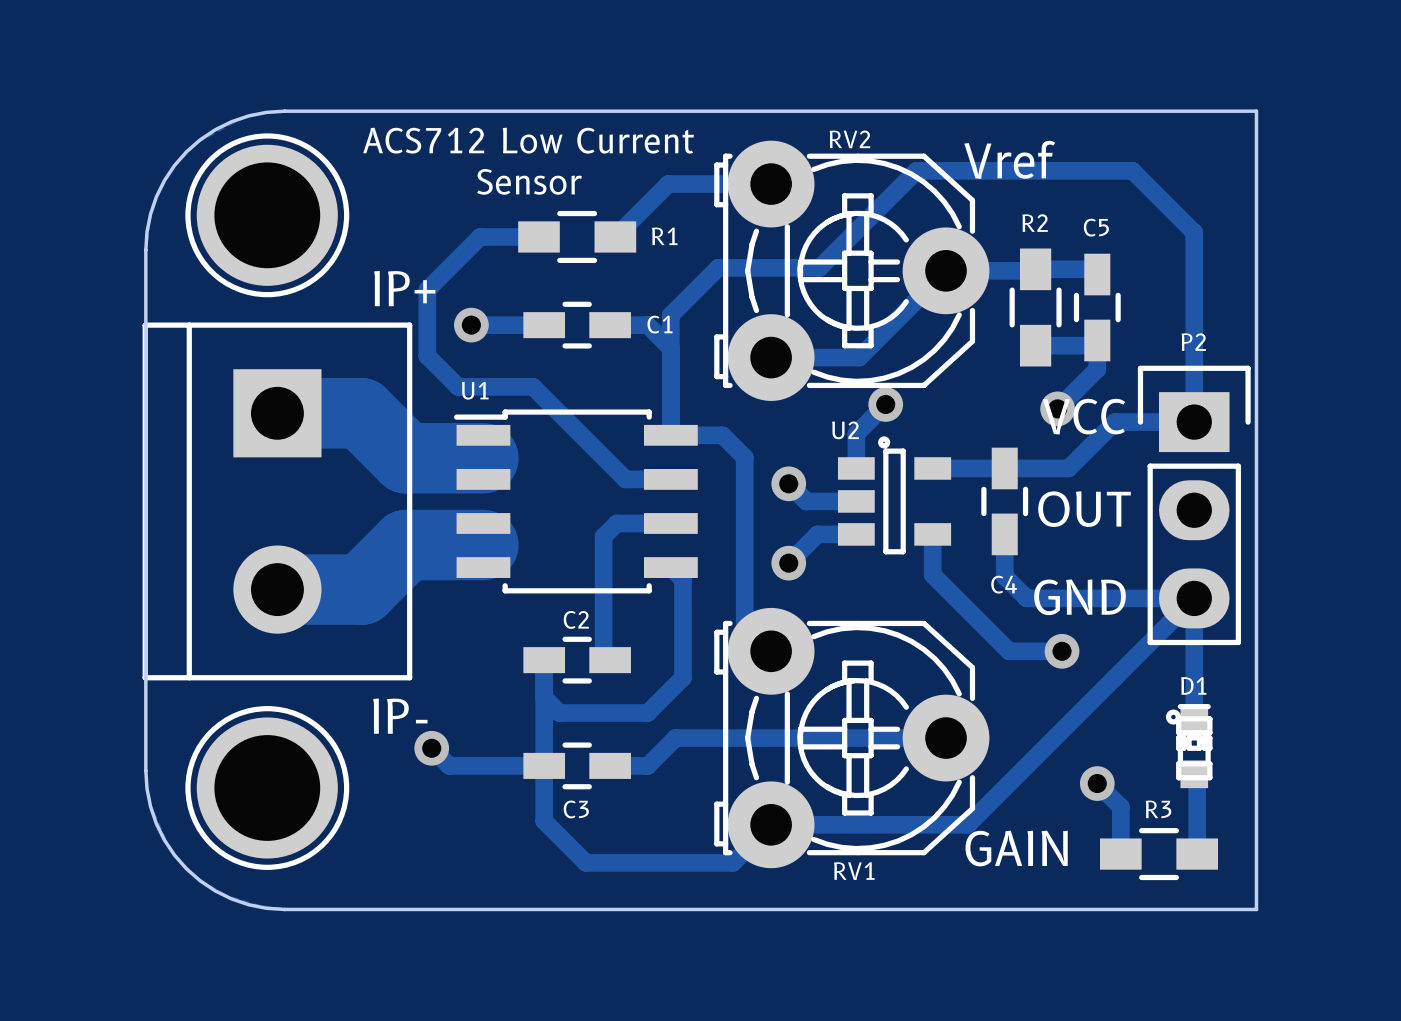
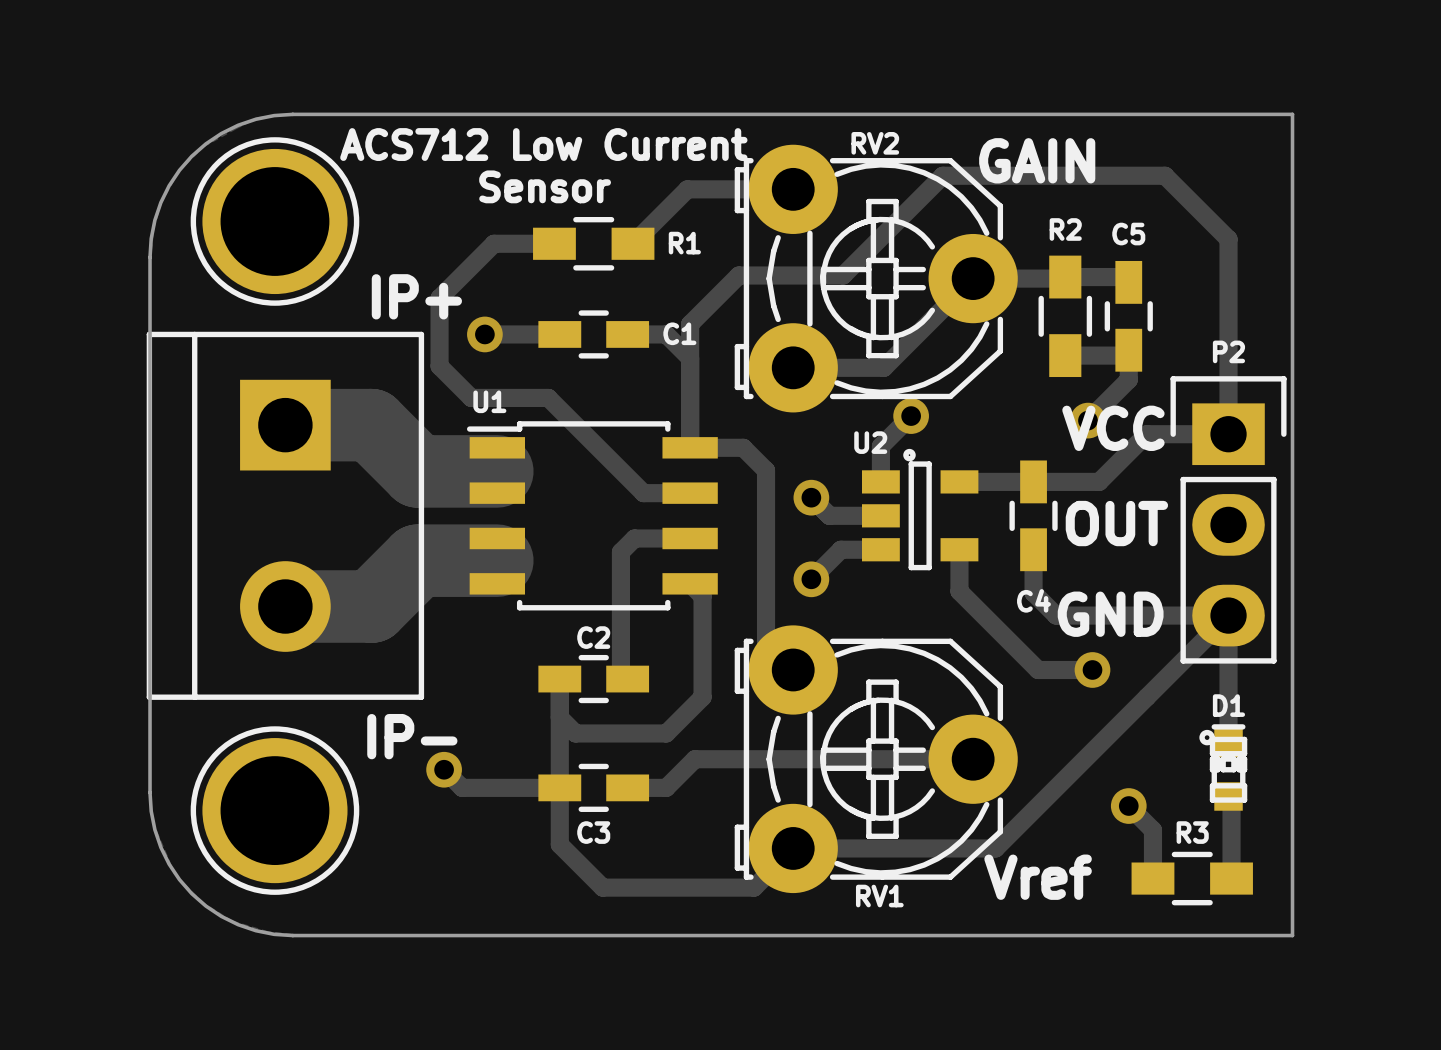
text position: Vref (1009, 159) -> Vref (1038, 877)
text position: GAIN (1016, 848) -> GAIN (1037, 160)

